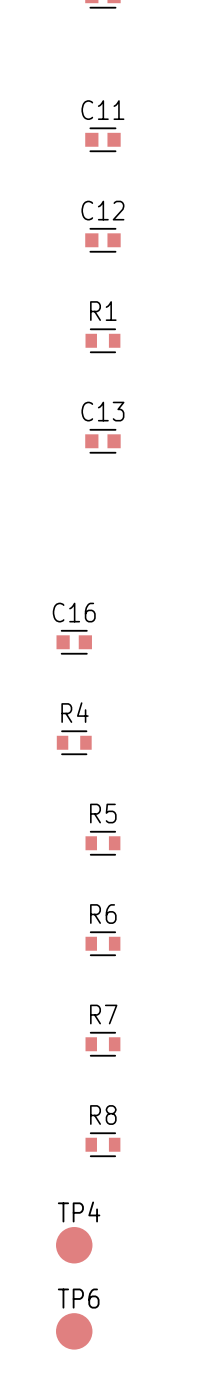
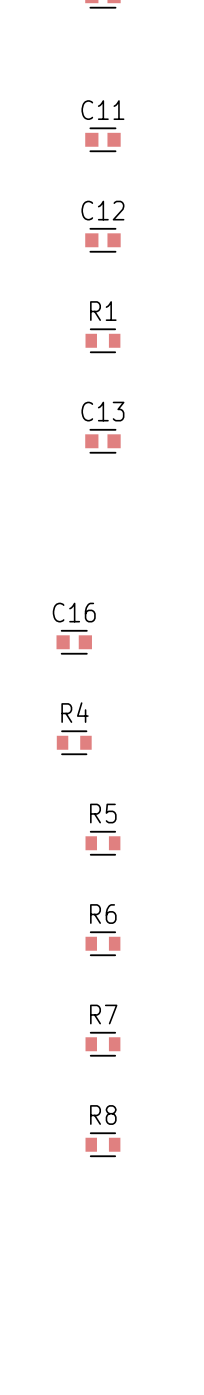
TP4: (74, 1245) -> none
TP6: (74, 1331) -> none

